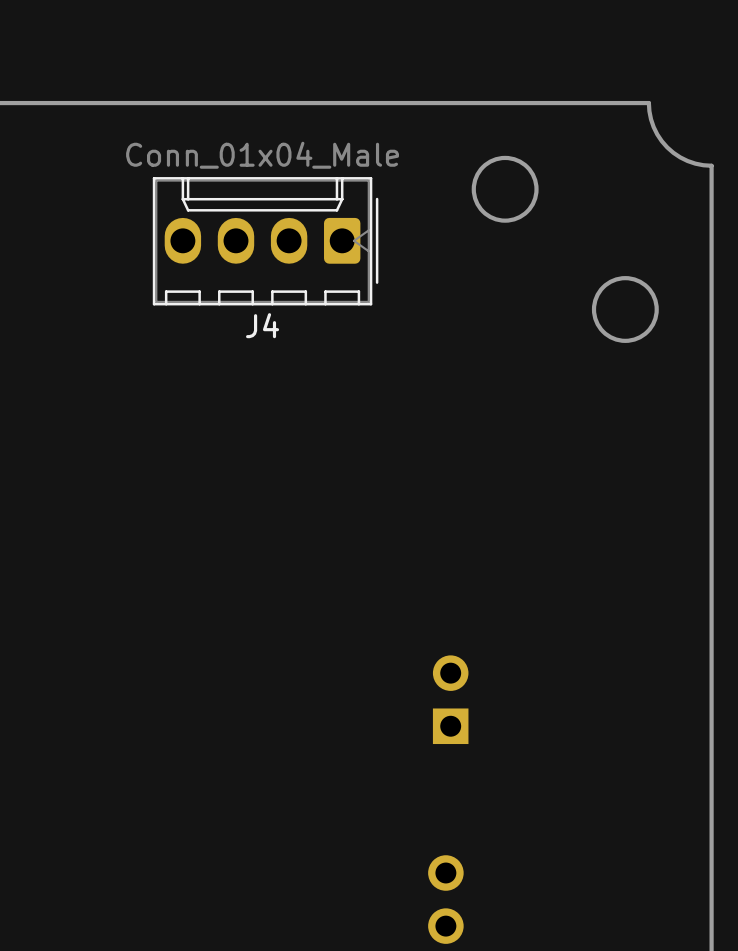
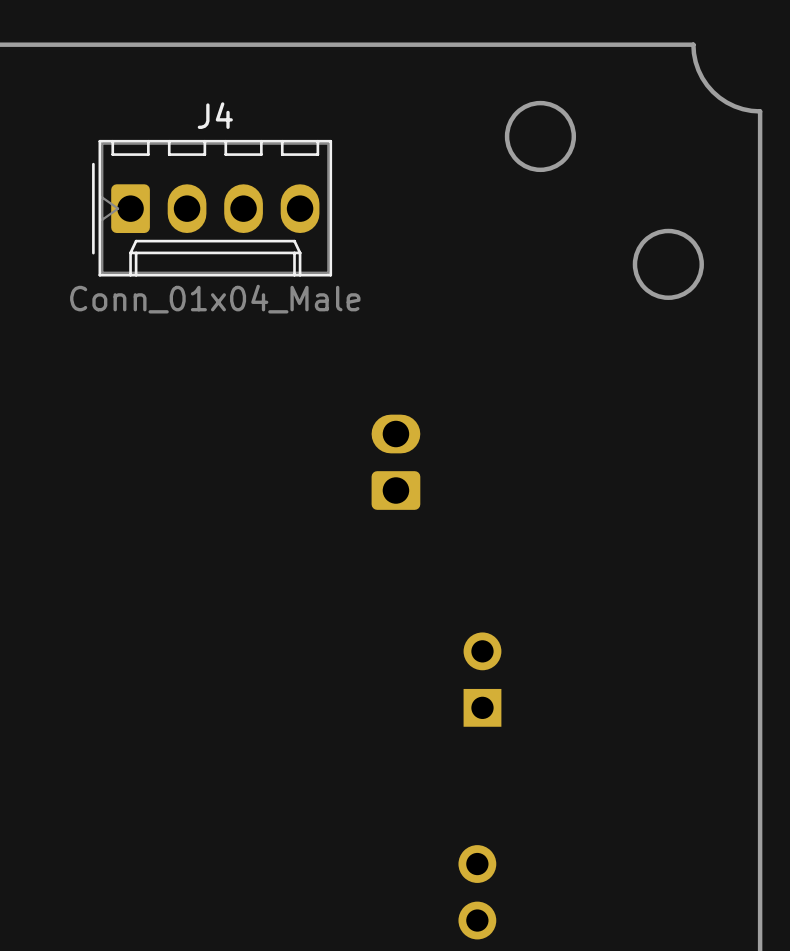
J4 rotation: 0° (265, 241) -> 180° (212, 208)
part: none -> (395, 462)

